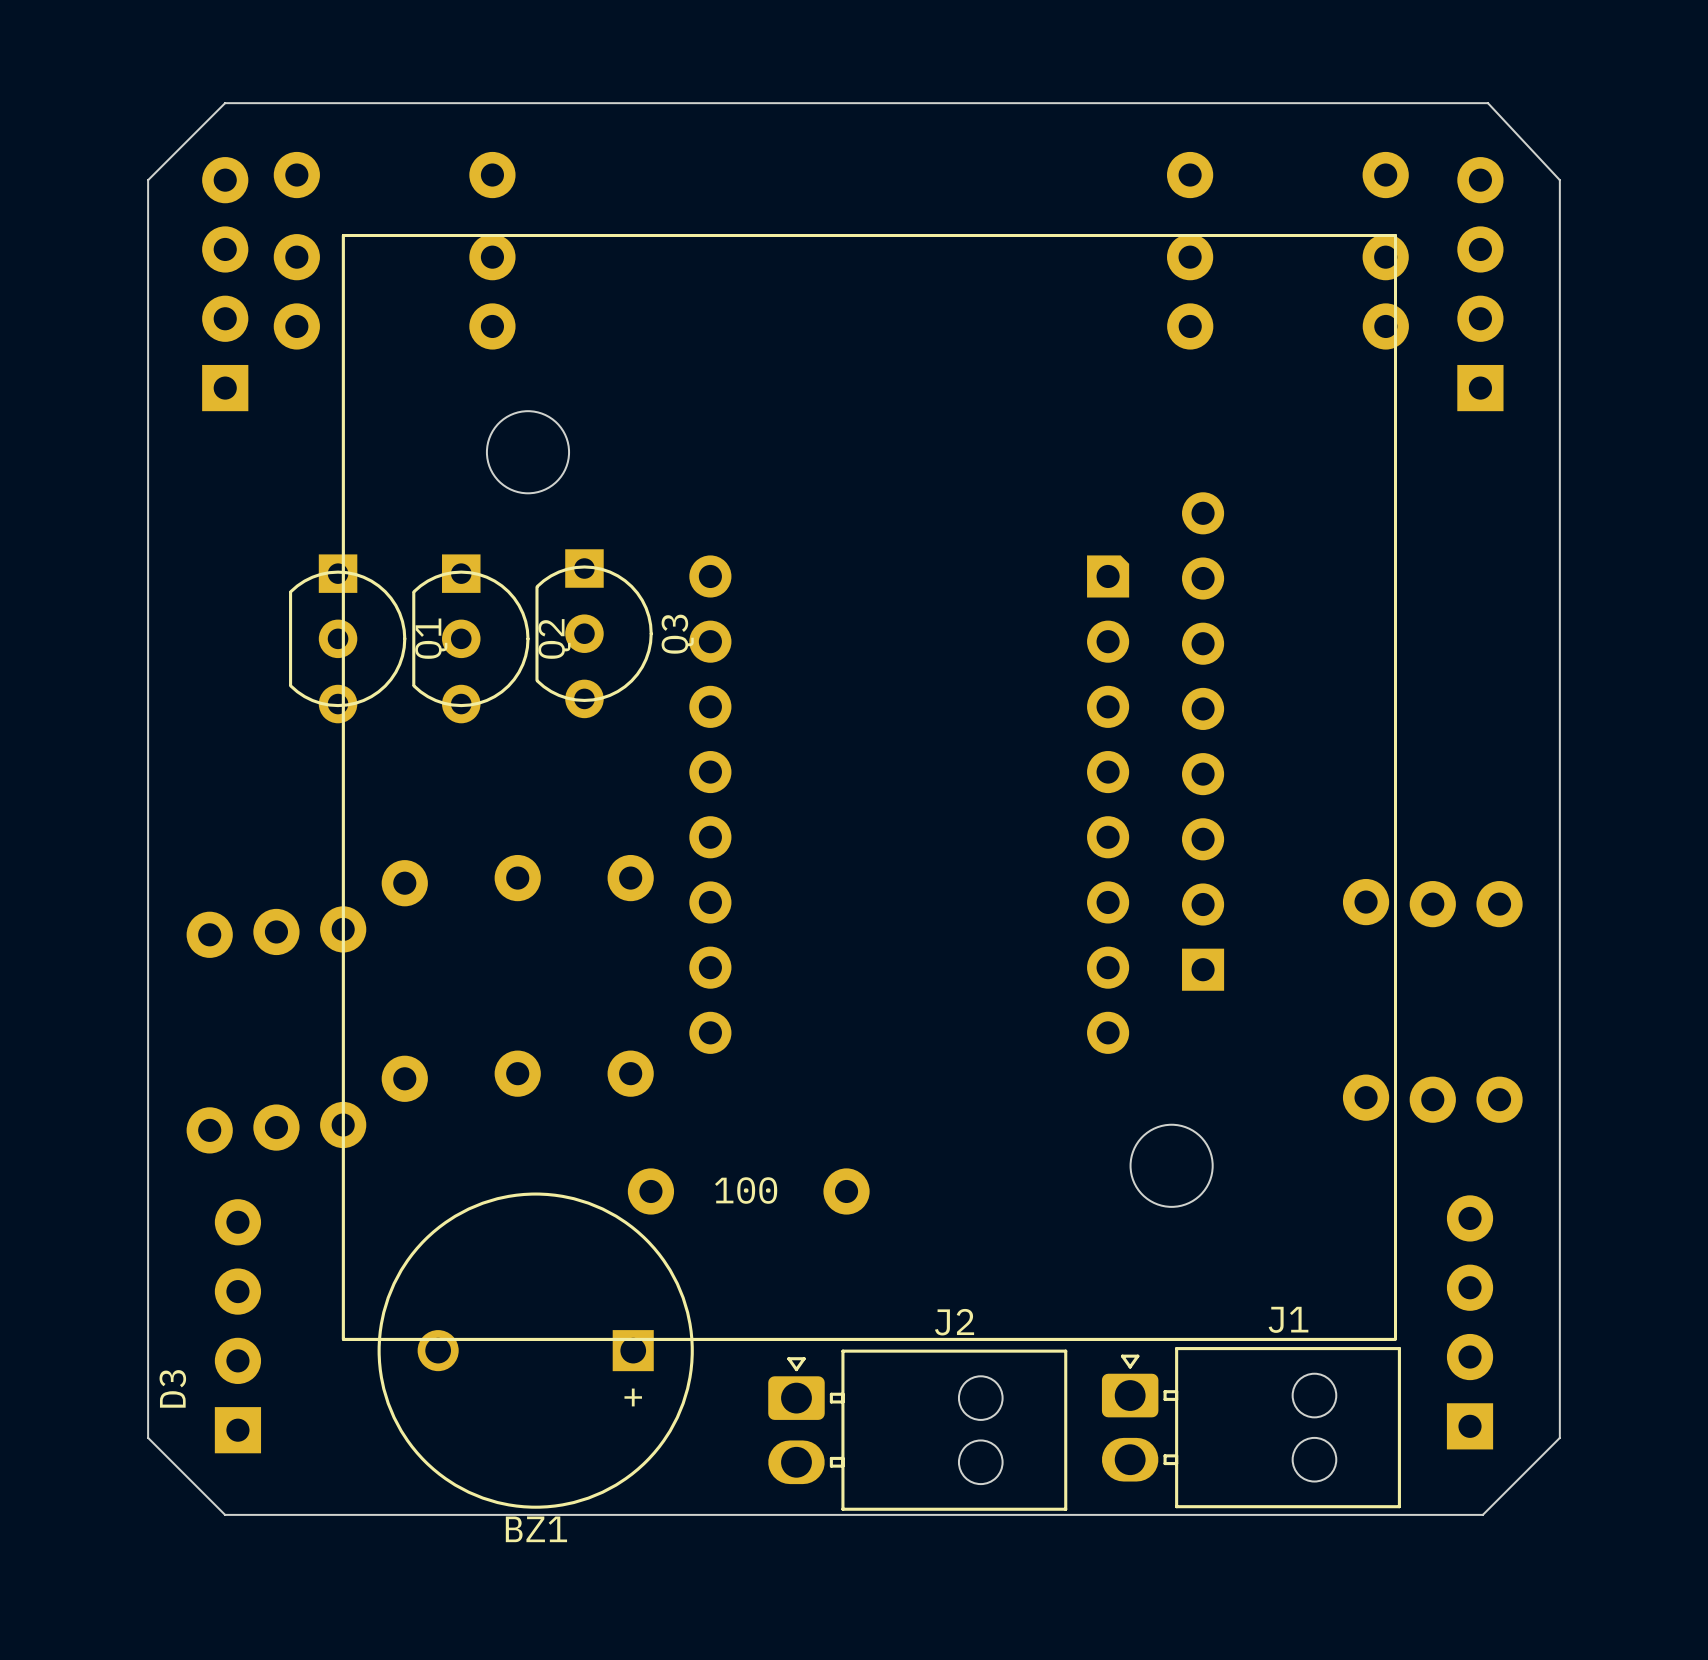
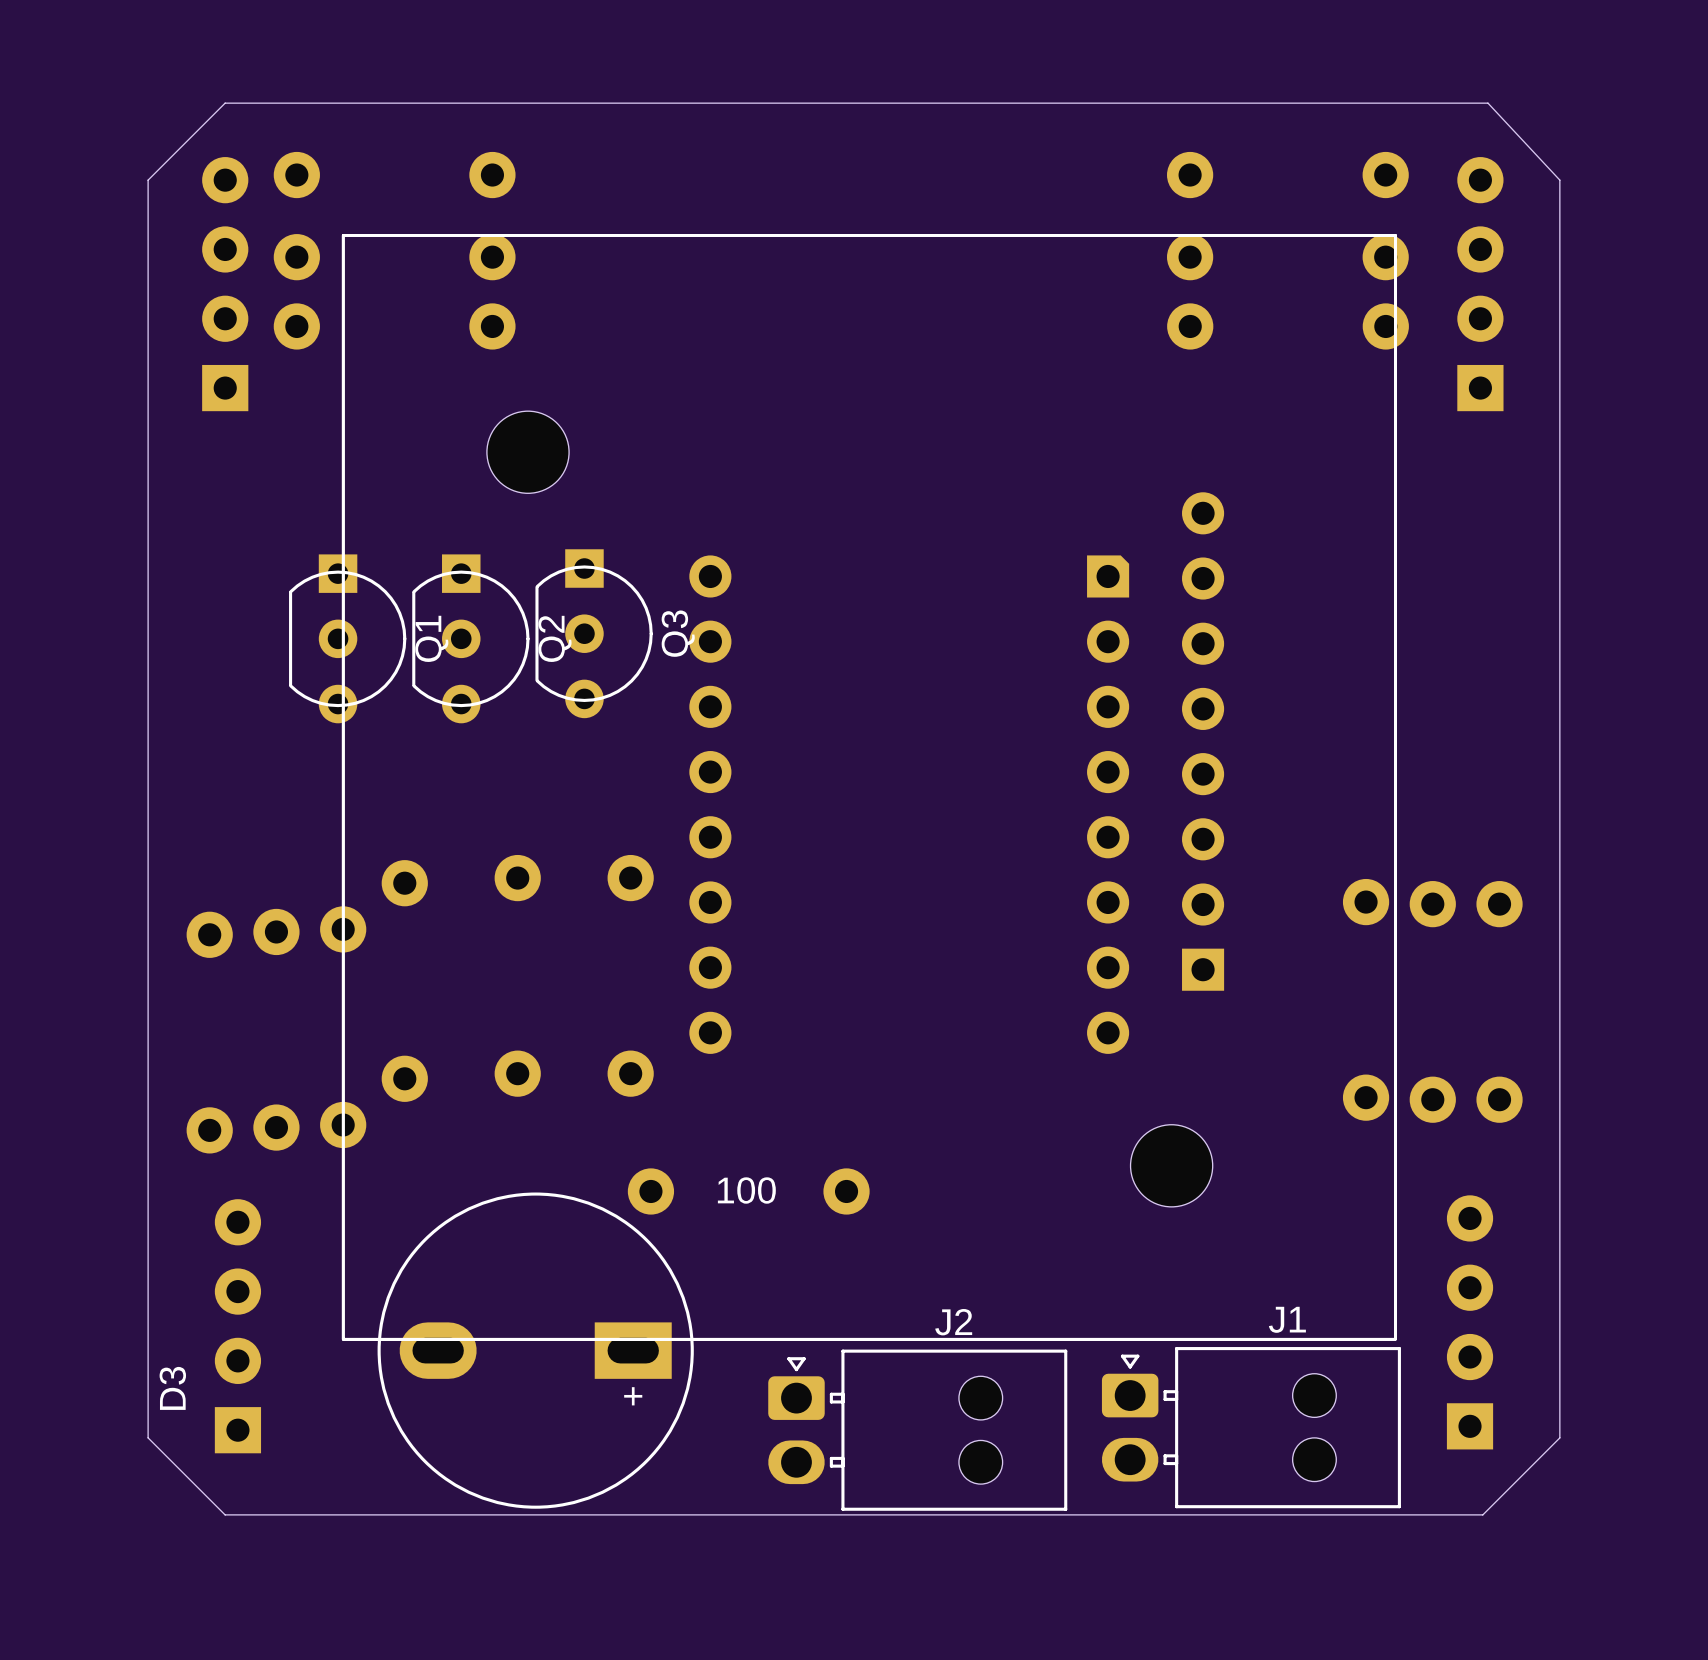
BZ1: (535, 1350) -> none
part: none -> (535, 1350)

